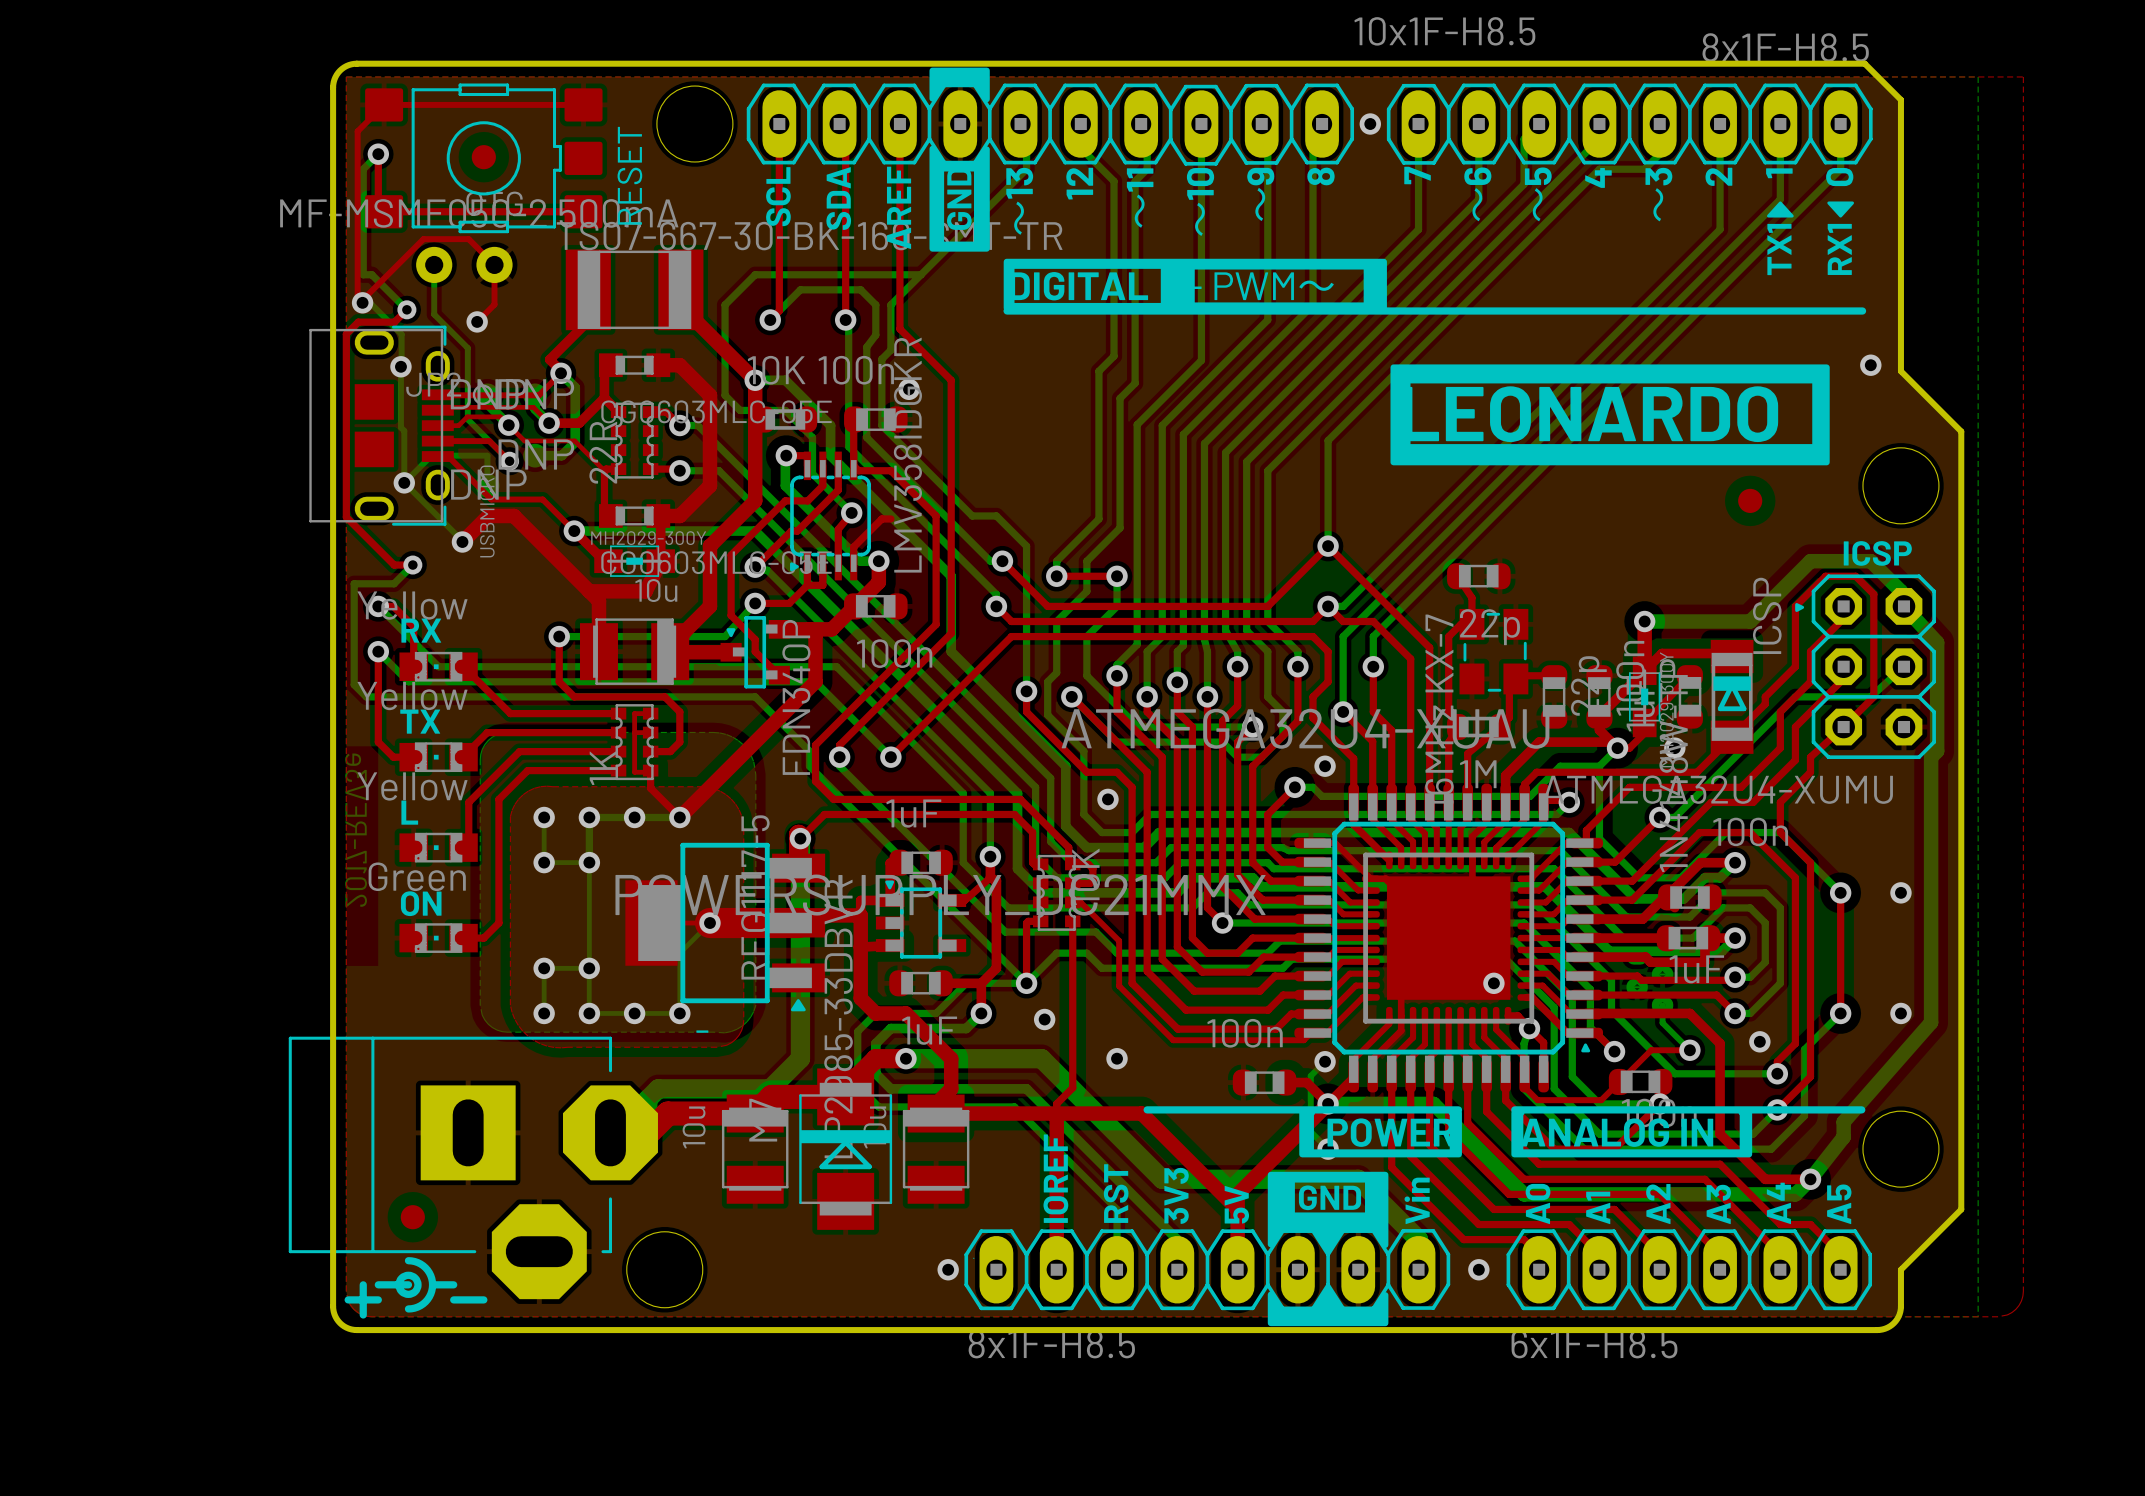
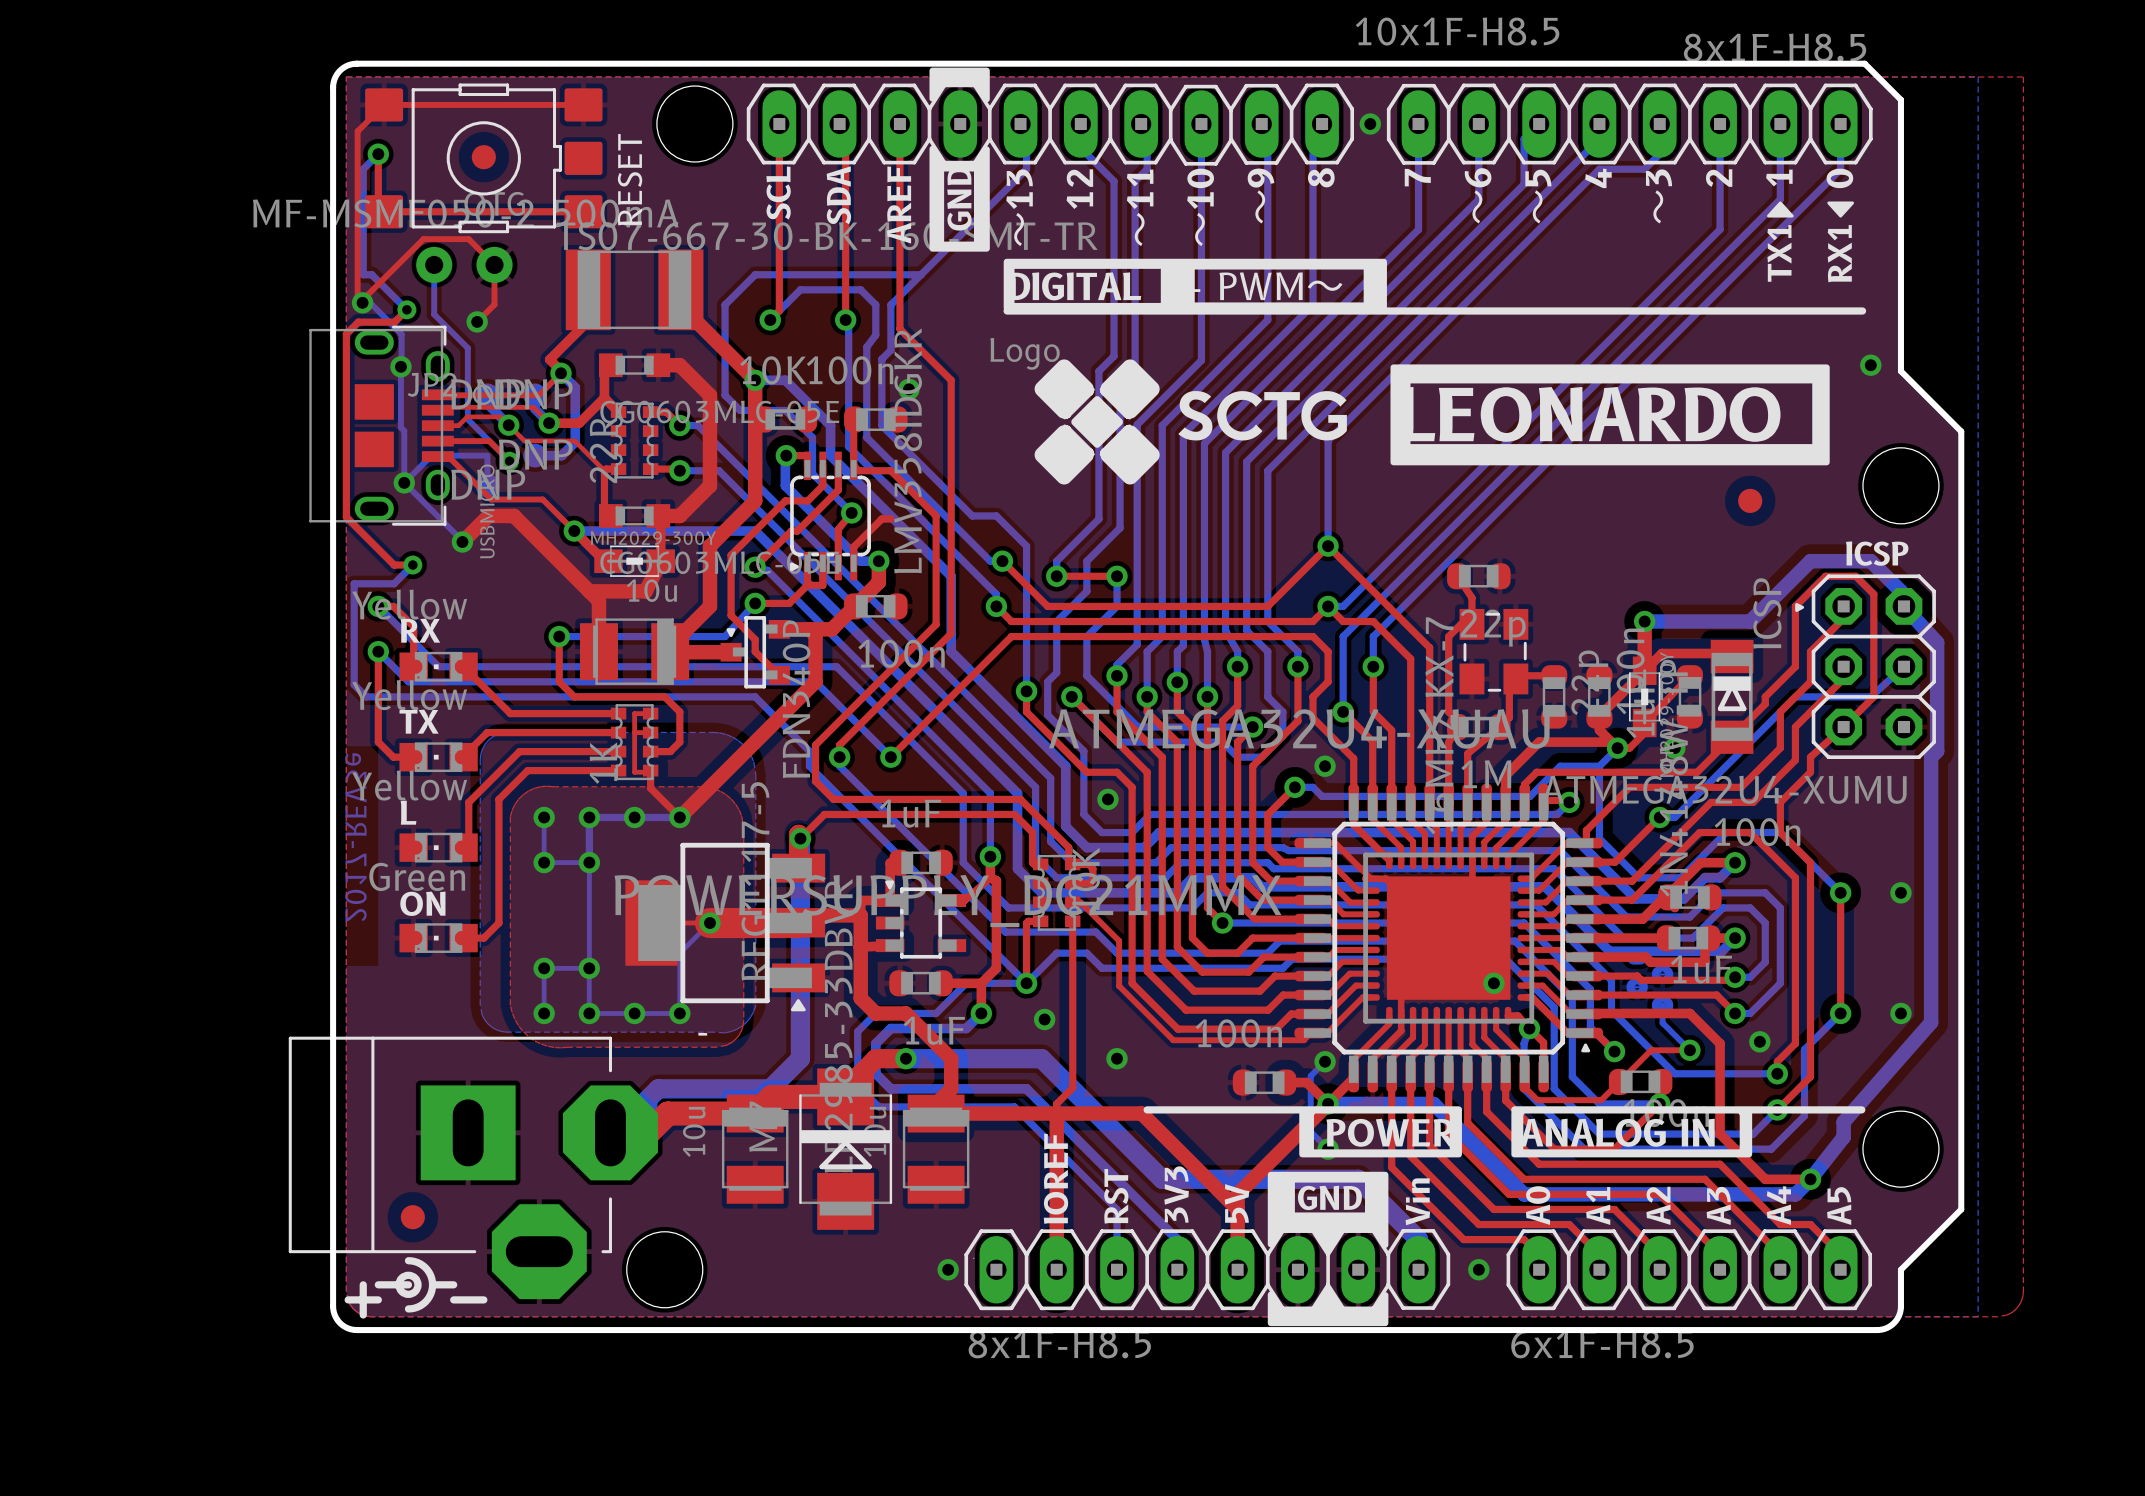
drawing: none -> [1034, 359, 1347, 485]

